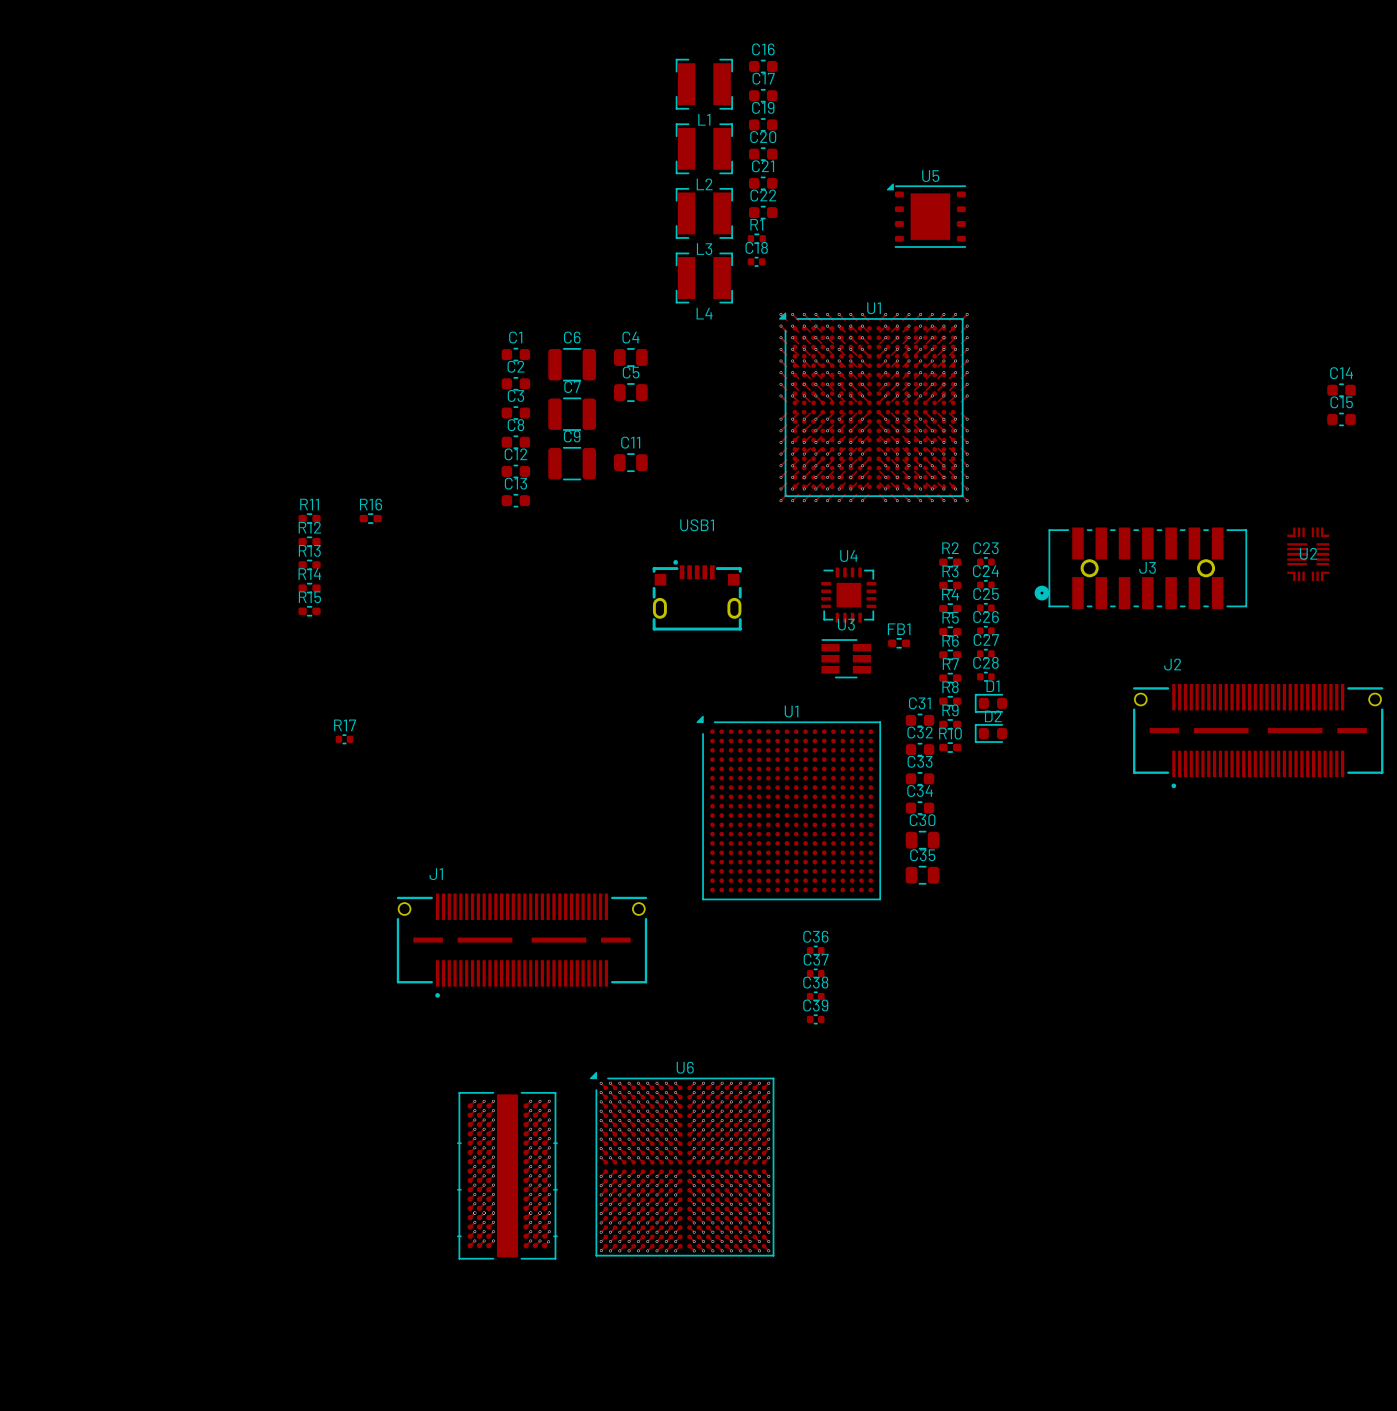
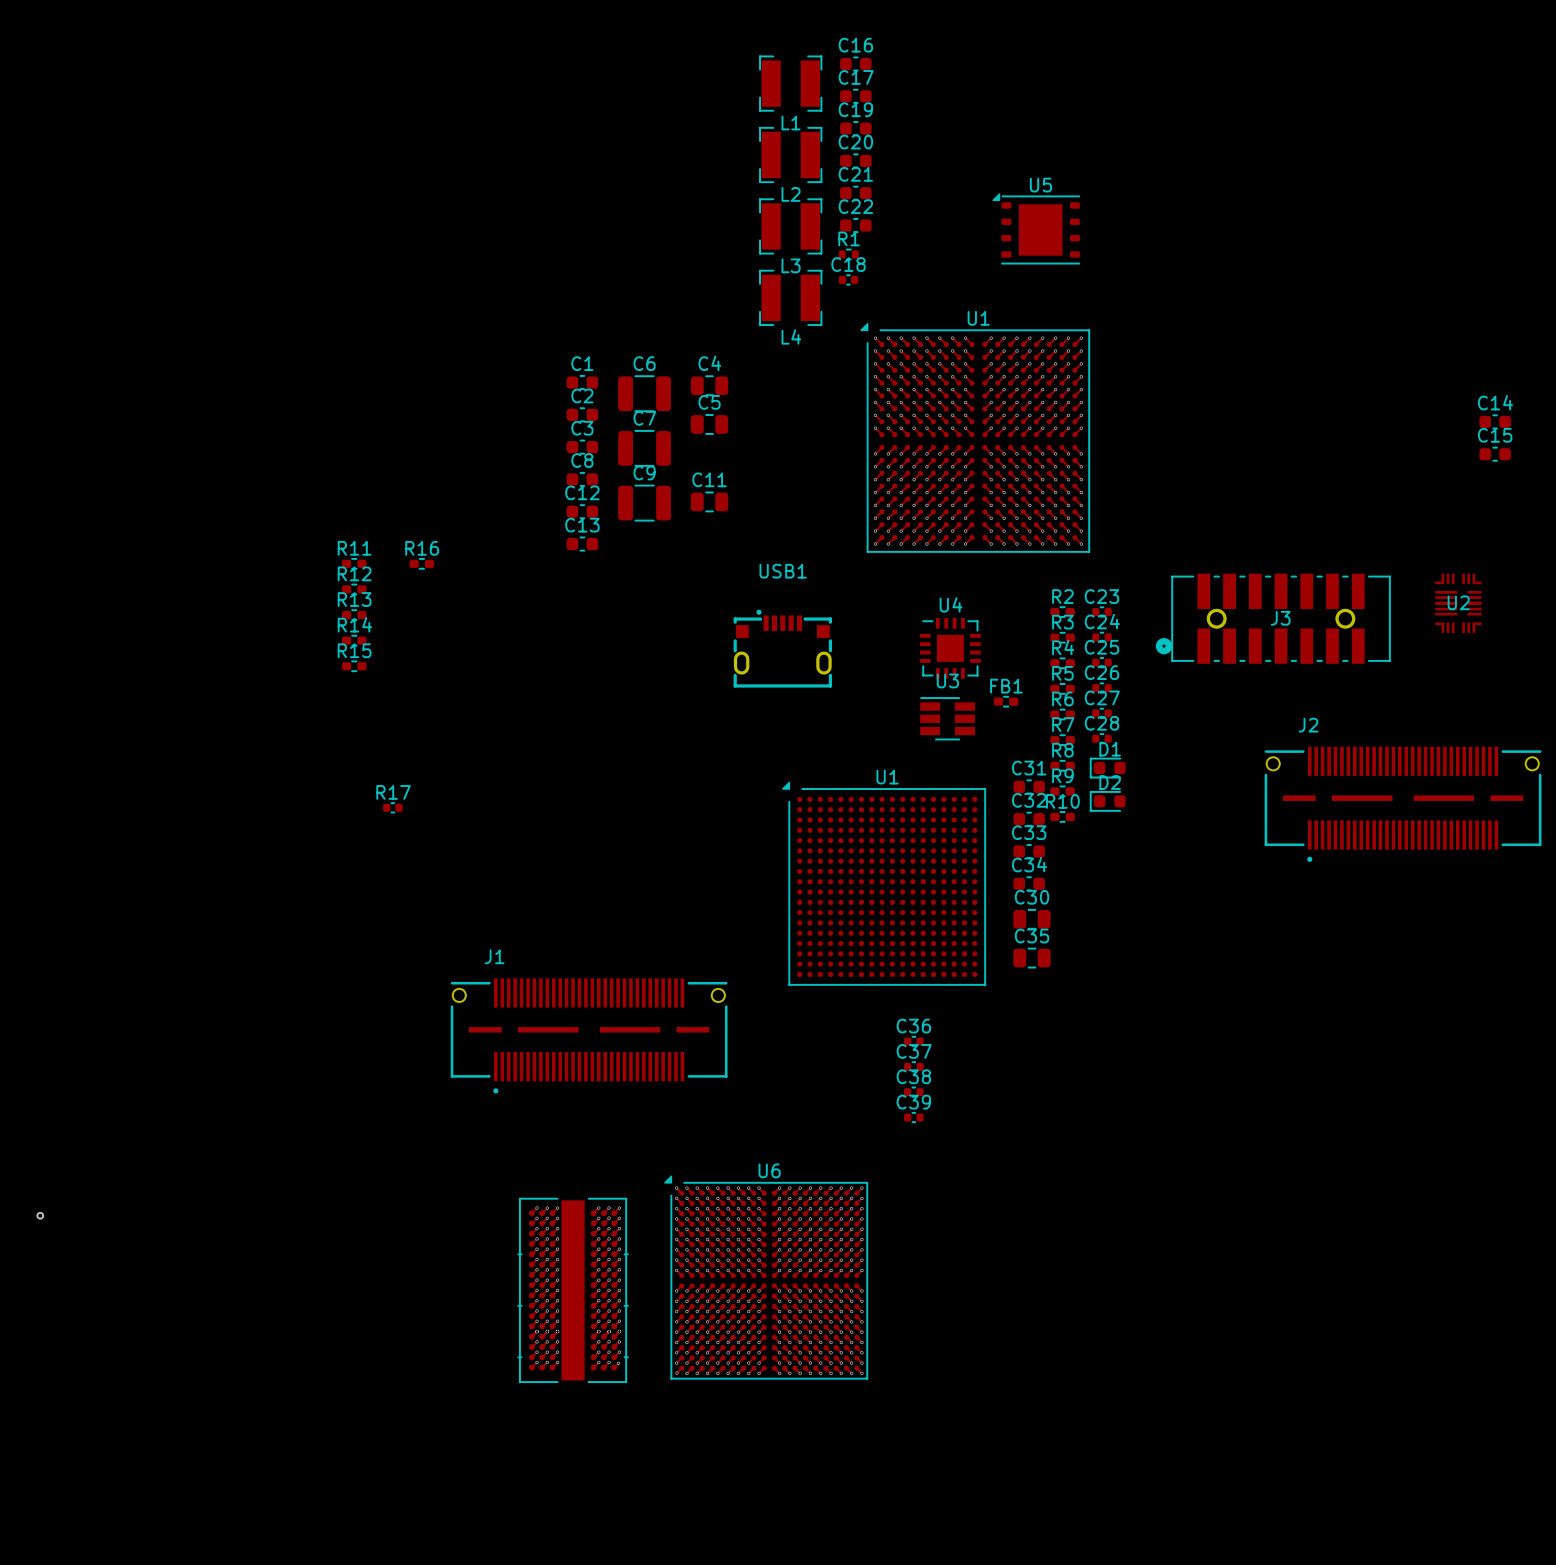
U1 footprint: [779, 312, 964, 497] -> [860, 323, 1090, 553]
via: none -> (40, 1215)

